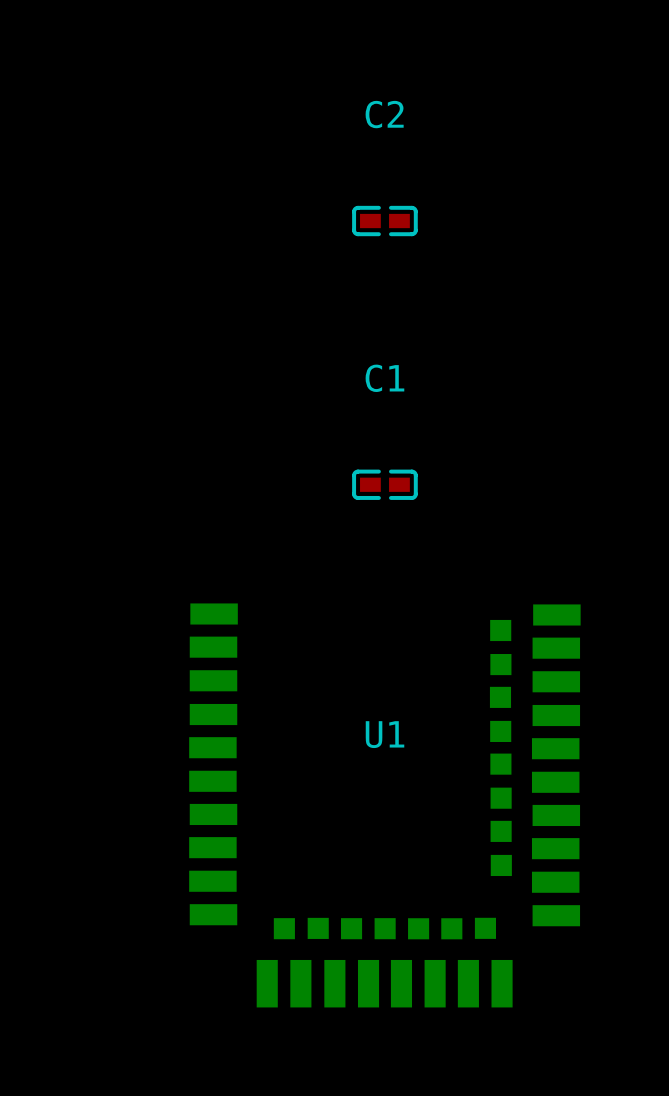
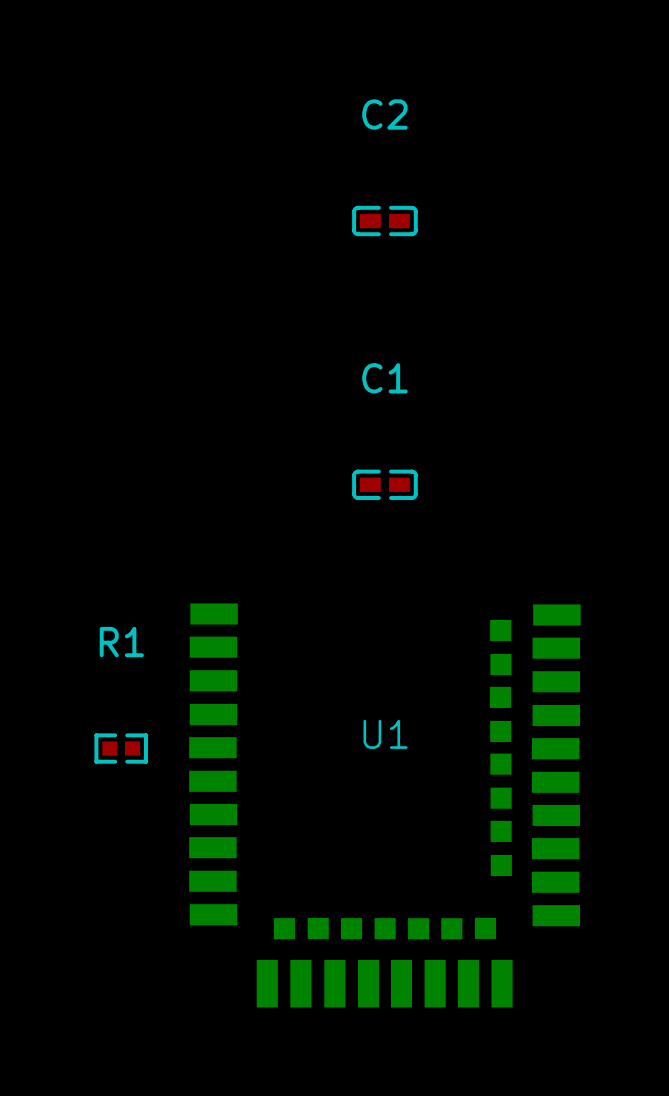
R1: none -> (121, 748)

